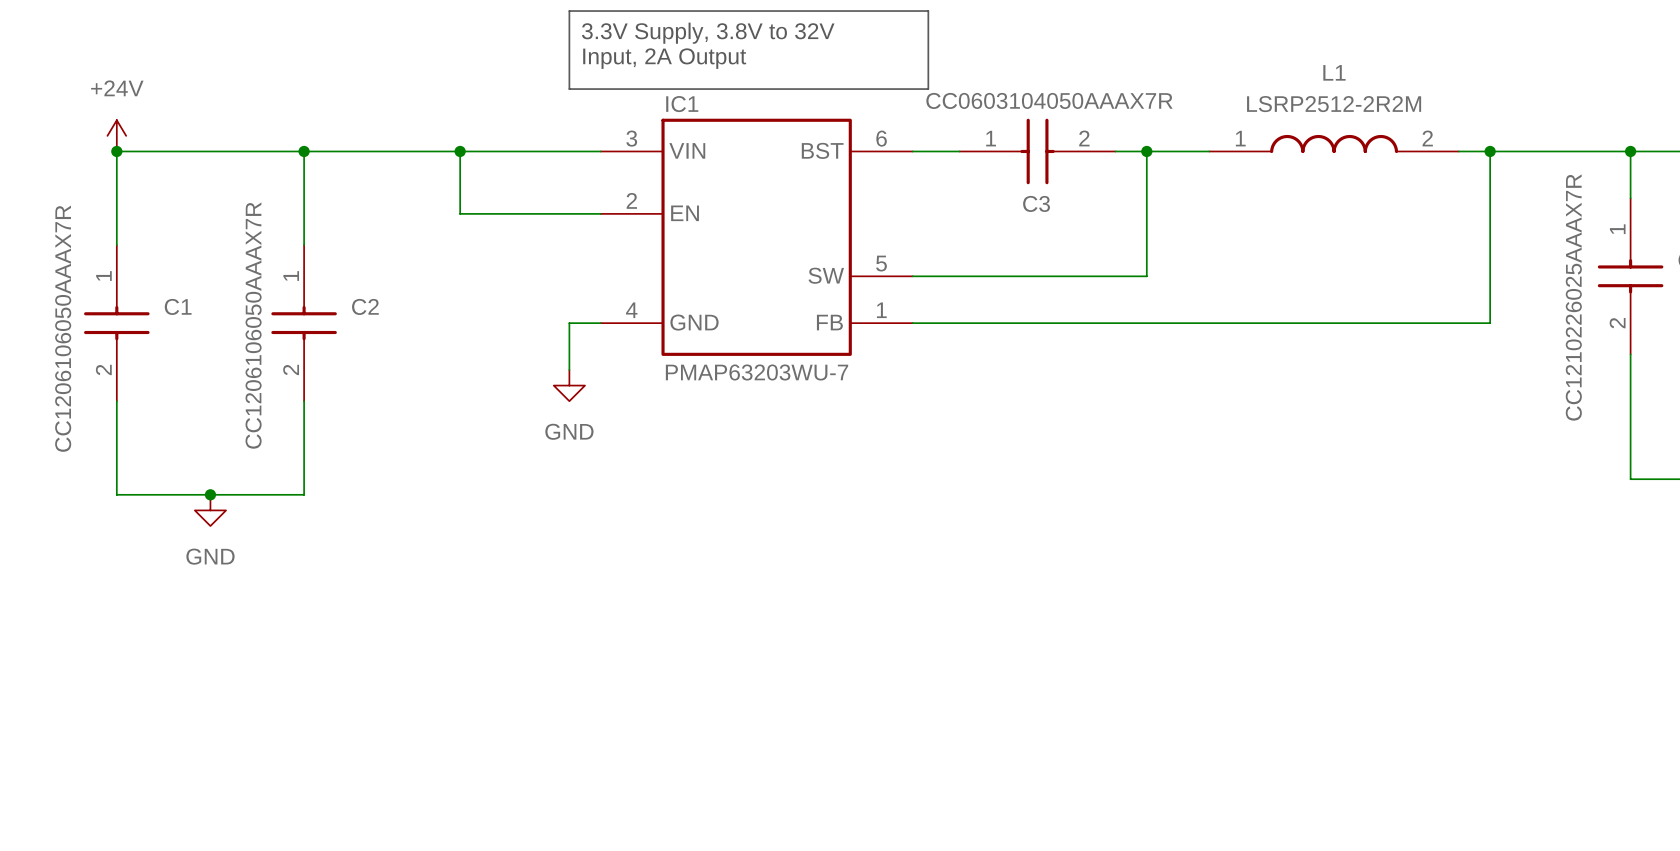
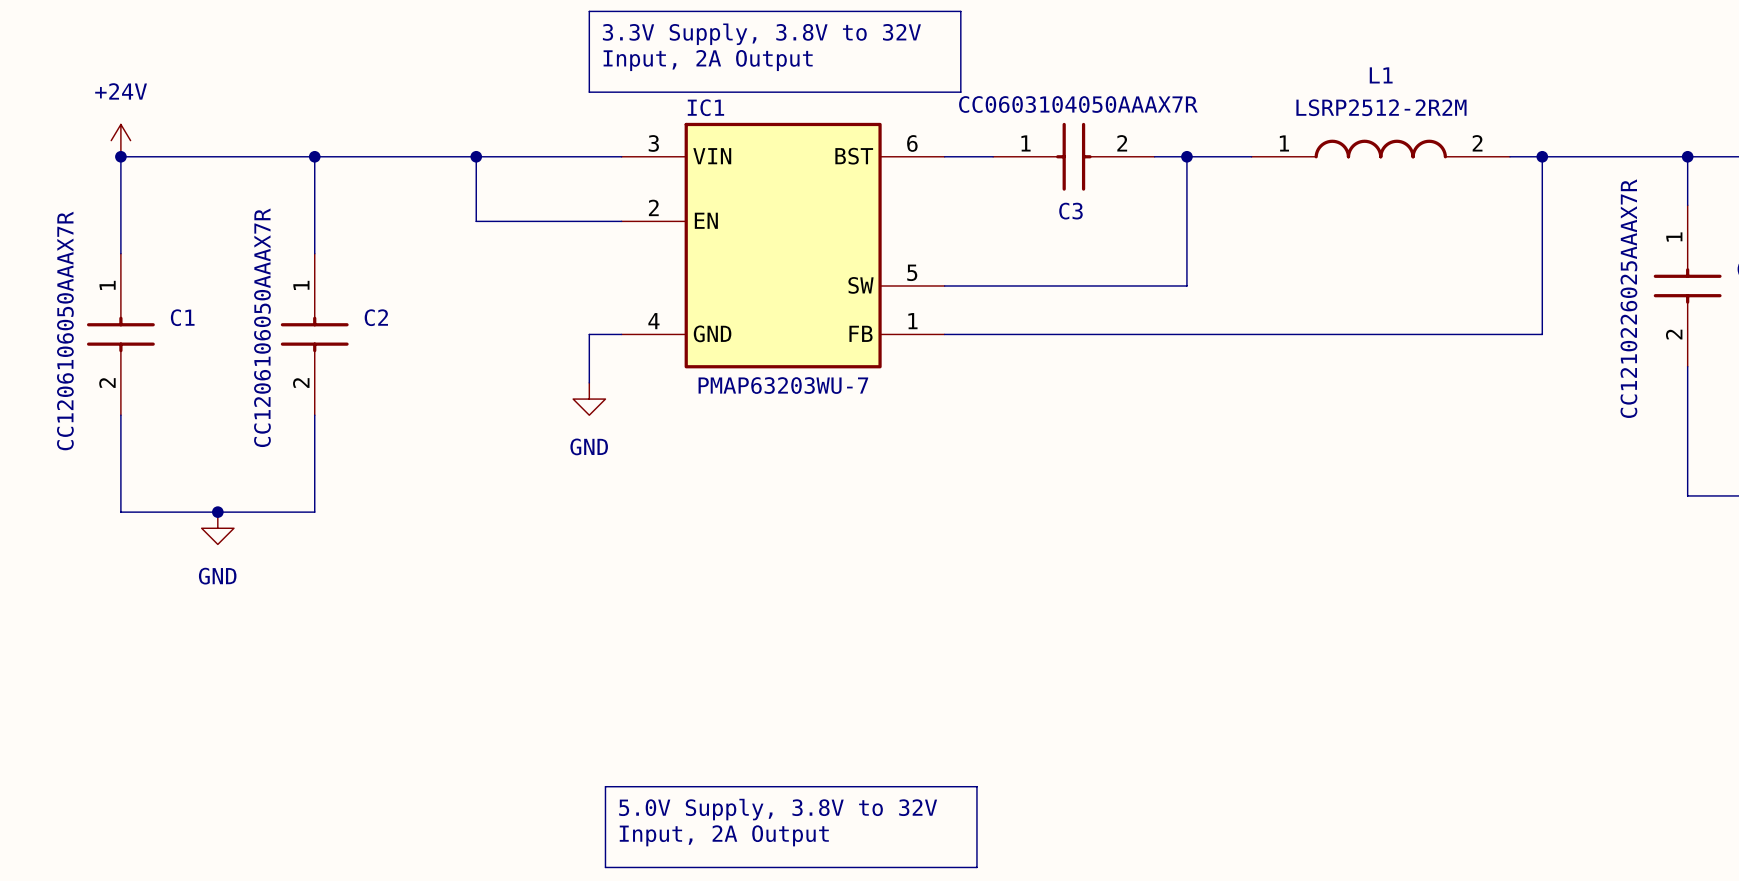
line: none -> (605, 786) (976, 786) (976, 867) (605, 867) (605, 786)
text: none -> 5.0V Supply, 3.8V to 32V (778, 809)
text: none -> Input, 2A Output (724, 835)

